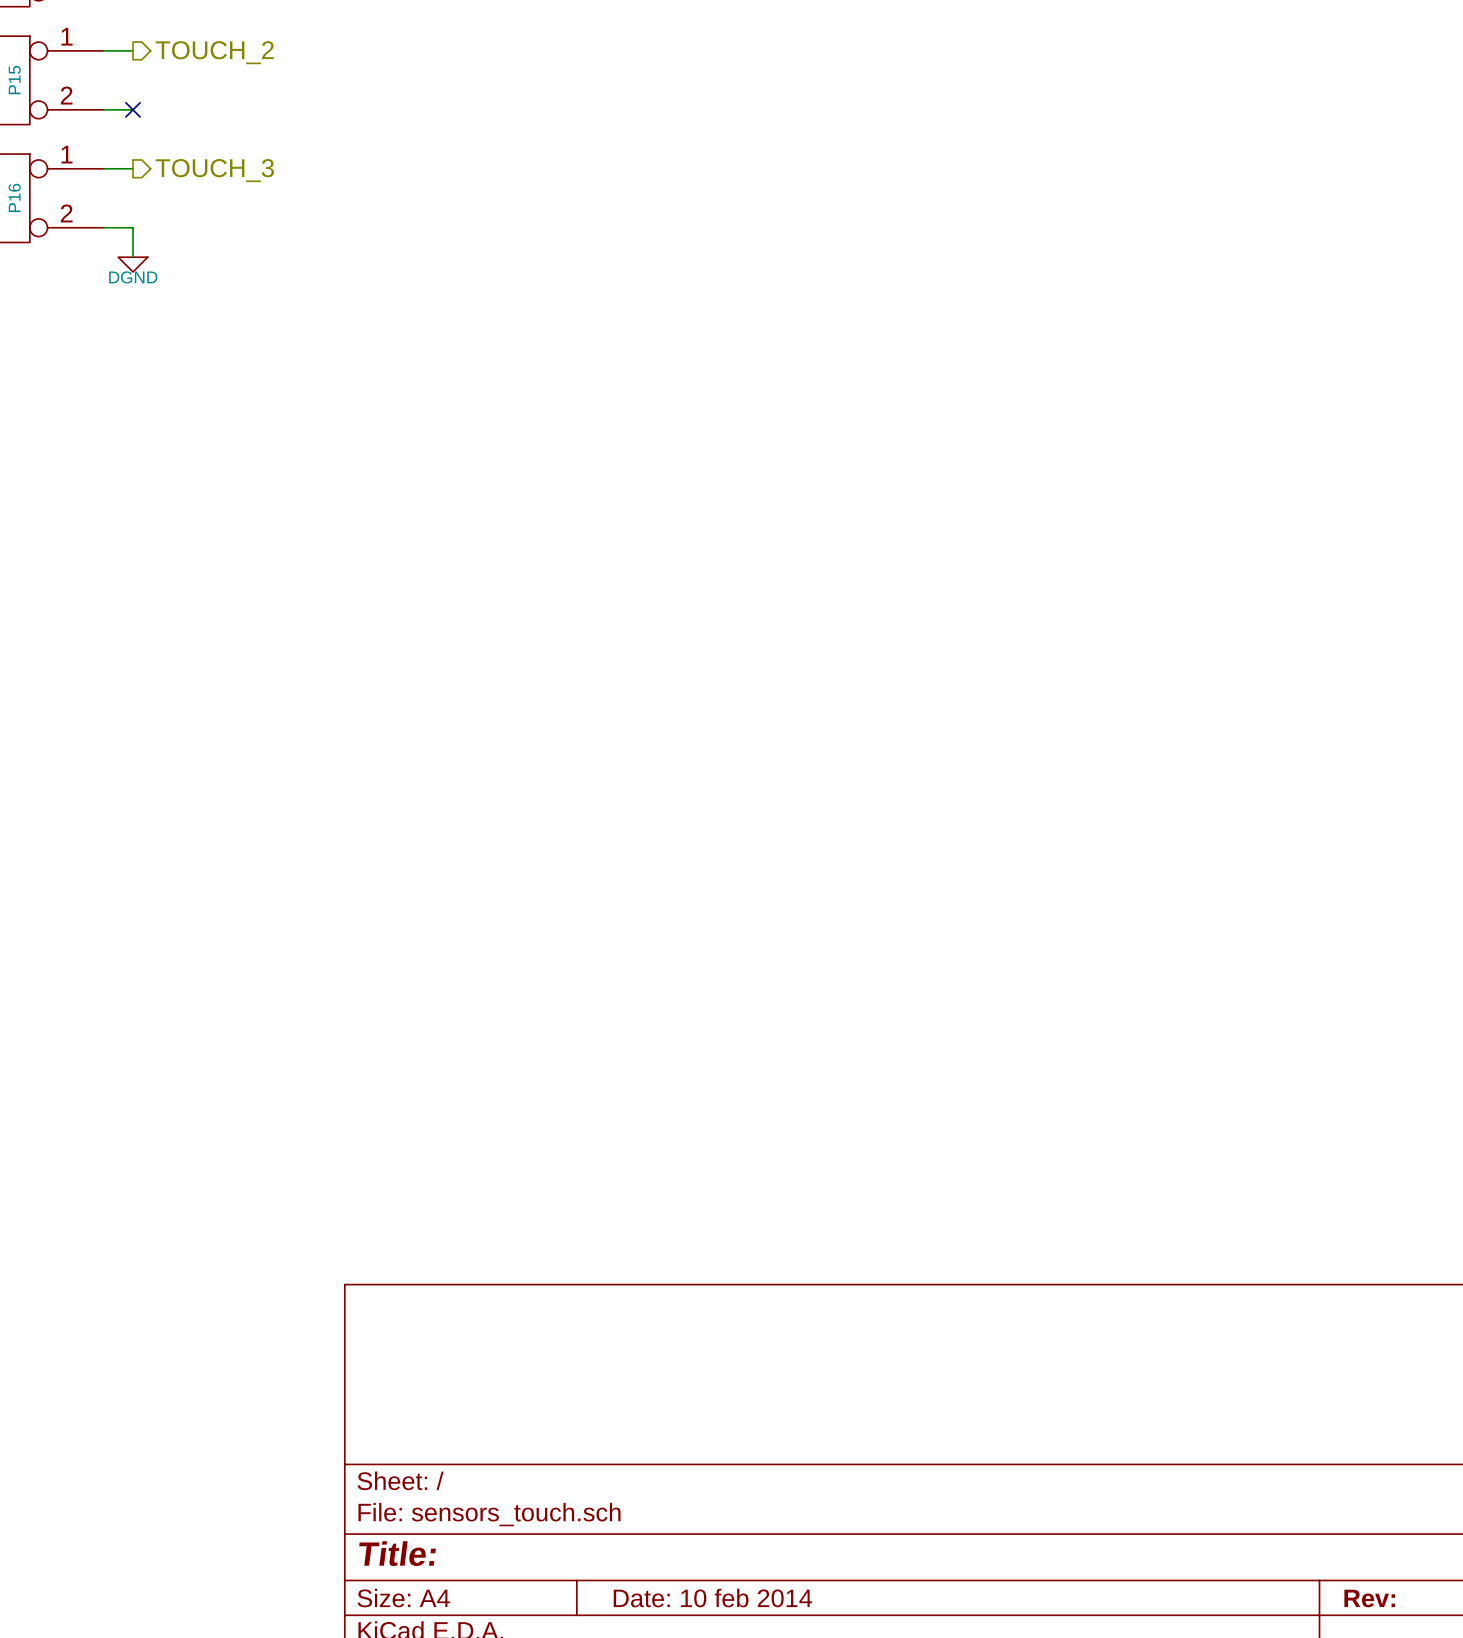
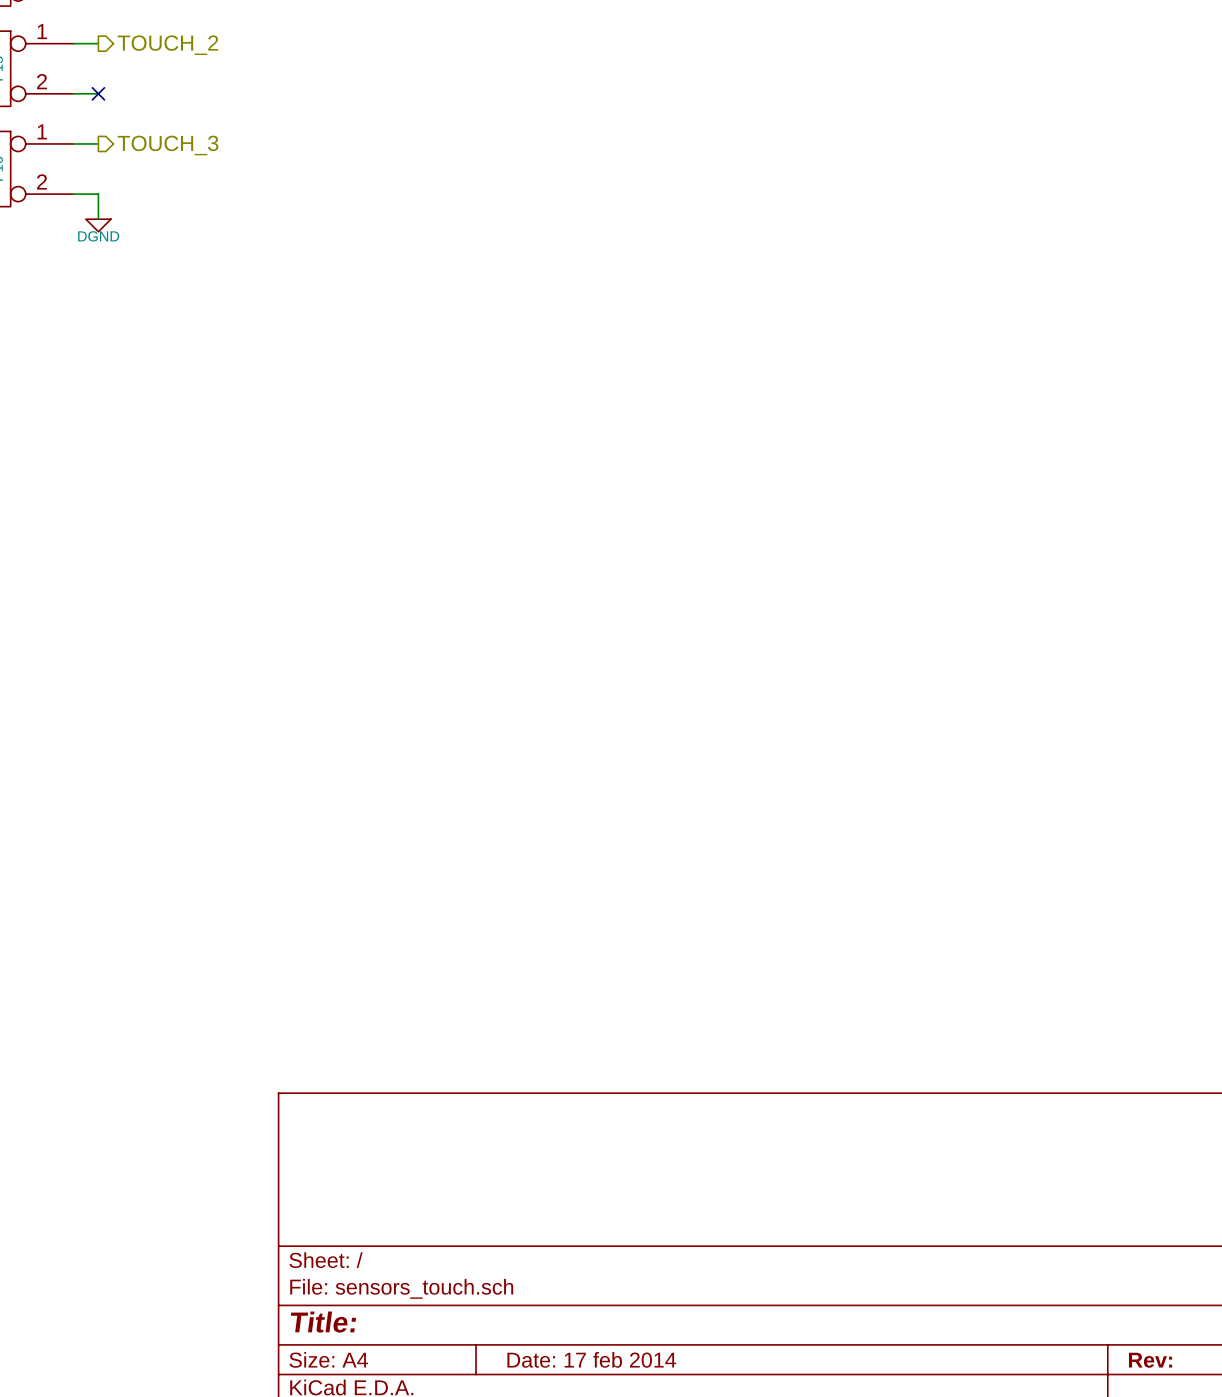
title block: Date: 10 feb 2014 (712, 1598) -> Date: 17 feb 2014 (591, 1359)

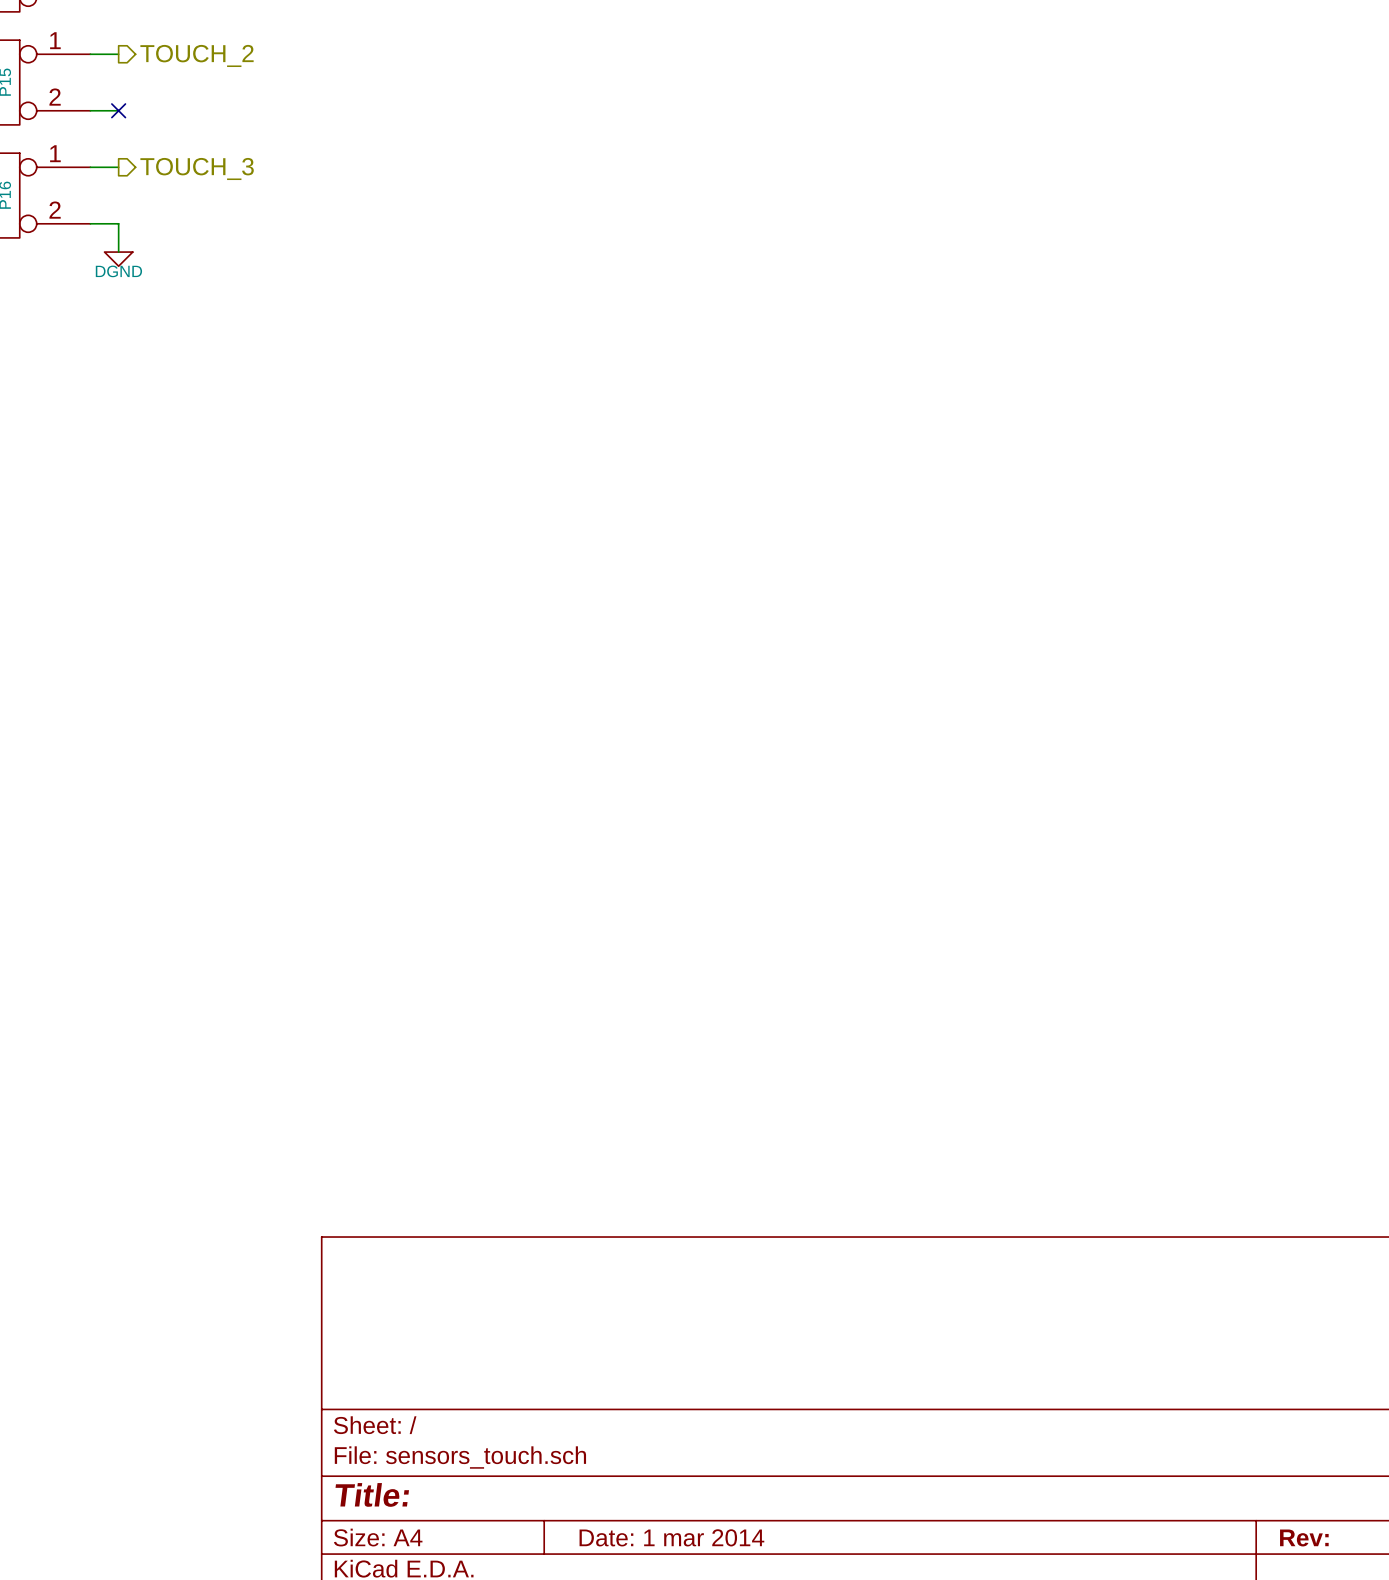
title block: Date: 17 feb 2014 (591, 1359) -> Date: 1 mar 2014 (671, 1537)

